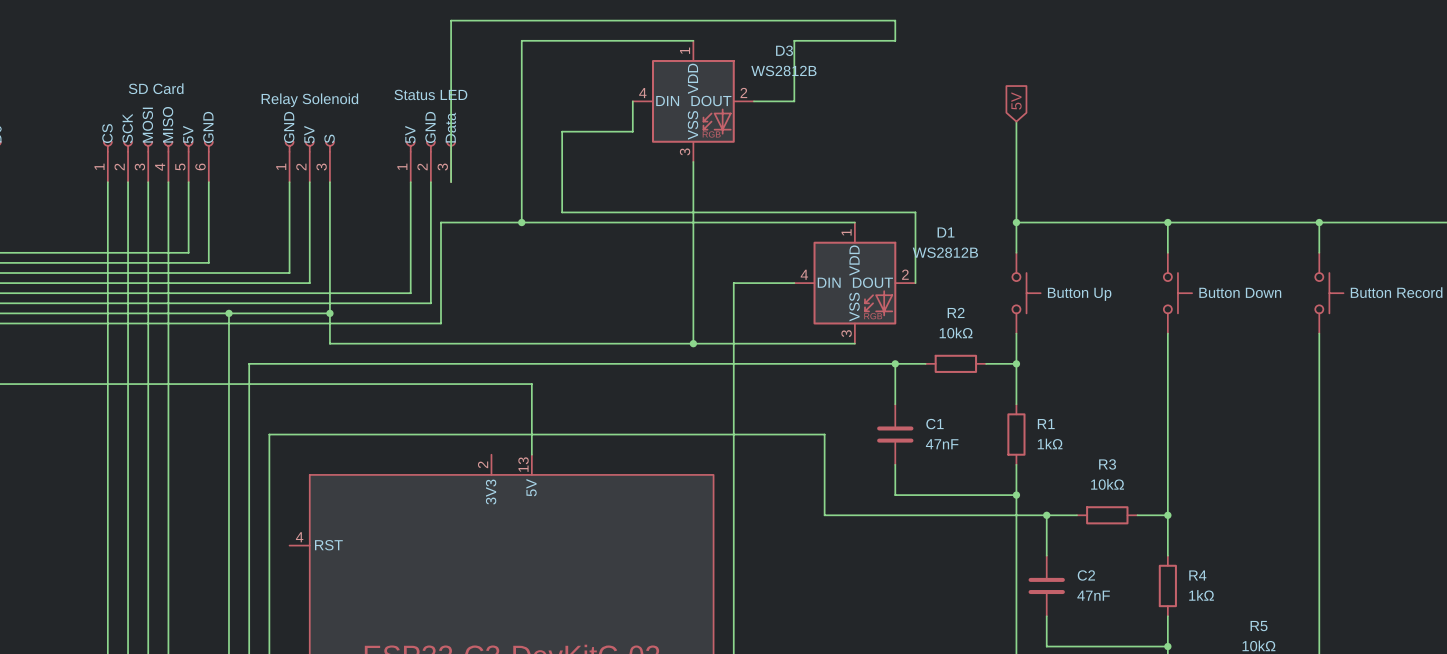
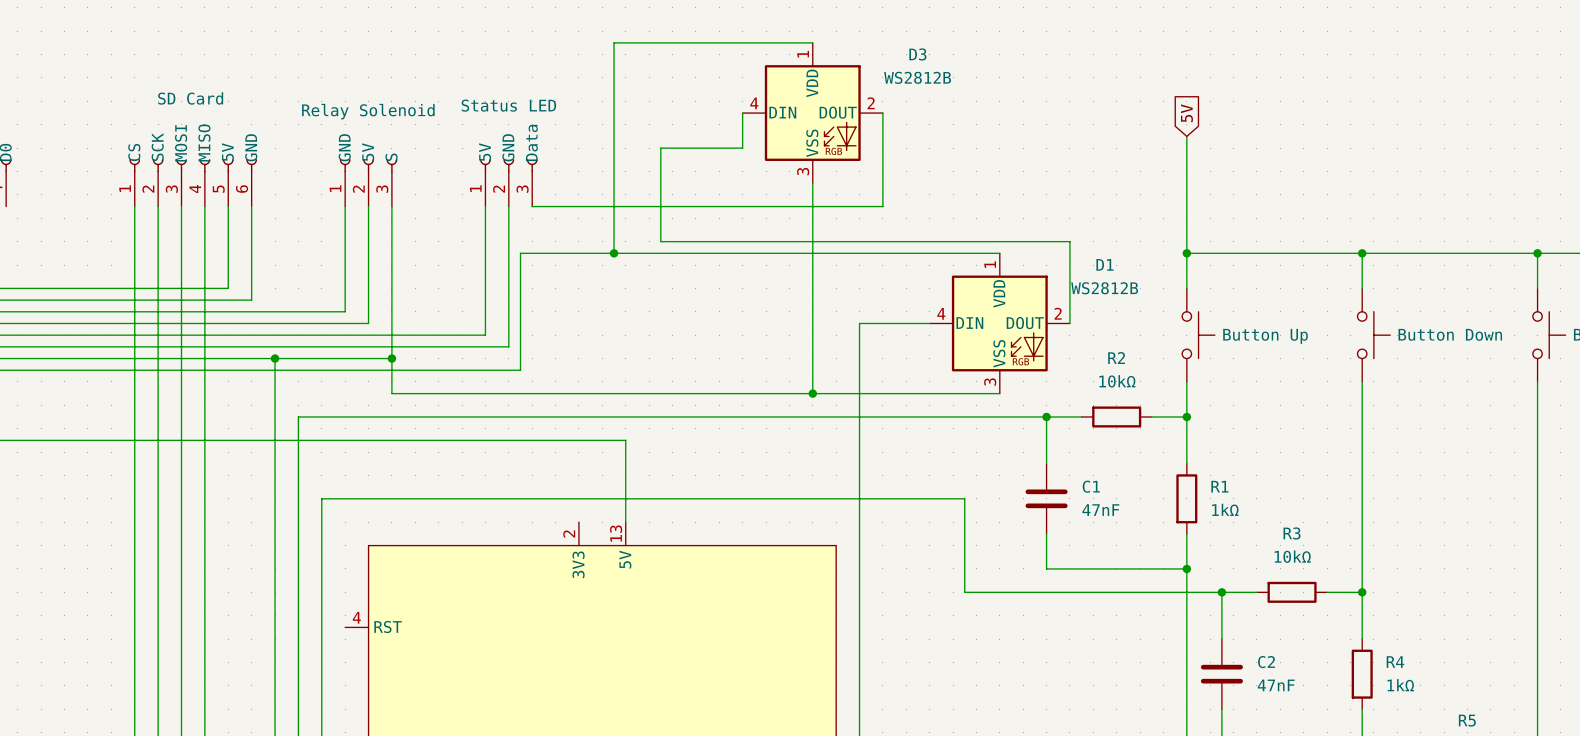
wire: (753, 101) (794, 101) (794, 40) (895, 40) (895, 20) (451, 20) (451, 182) -> (882, 113) (882, 206) (532, 206)

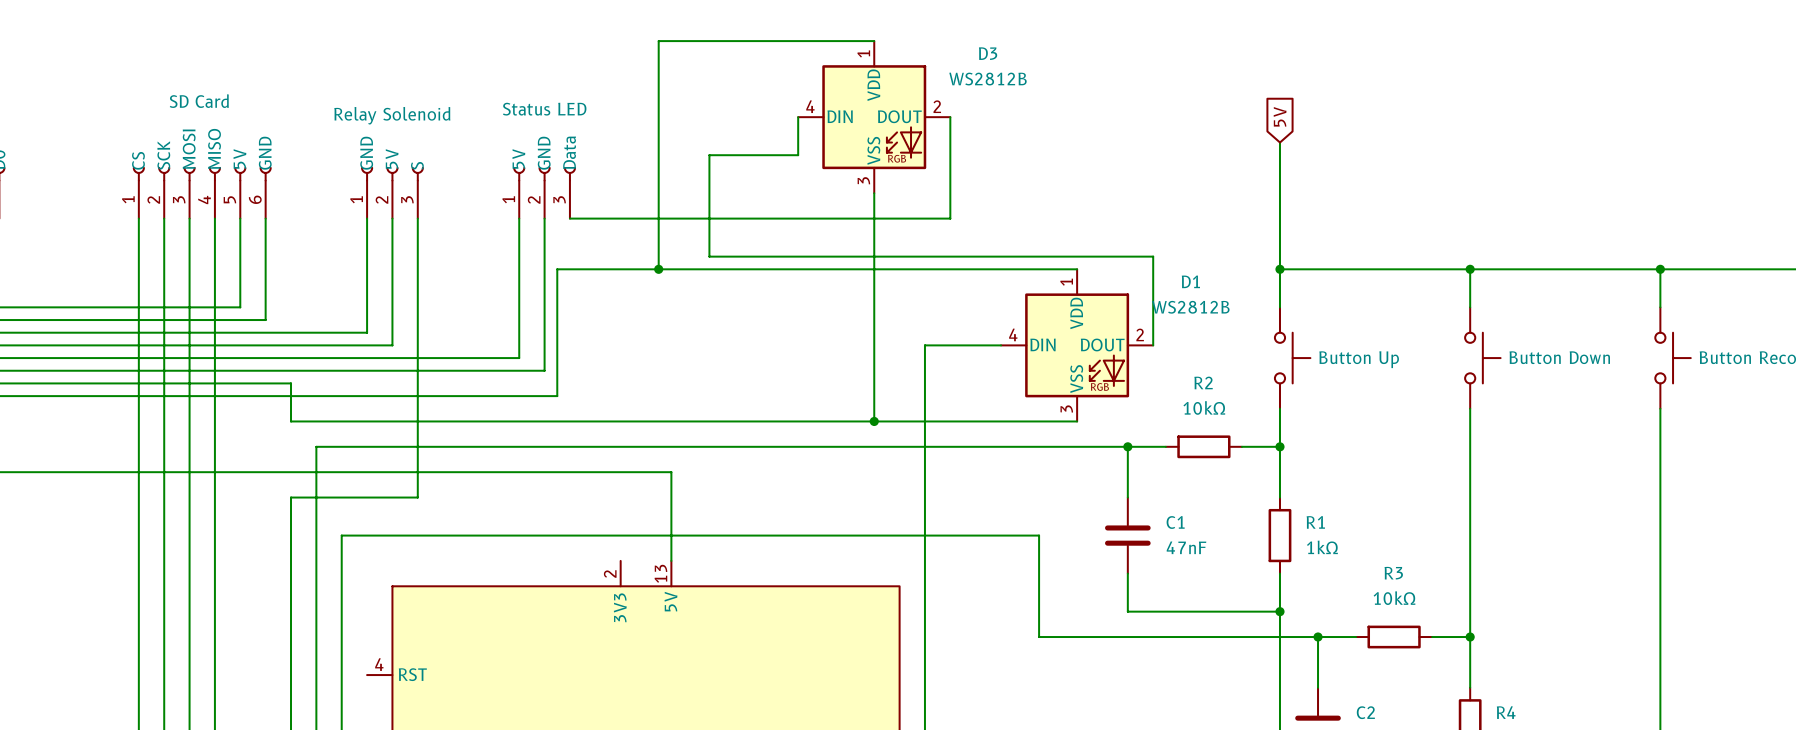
wire: (275, 358) (391, 358) -> none
junction: (275, 358) -> none
junction: (391, 358) -> none
wire: (275, 393) (275, 463) -> (291, 421) (417, 421) (417, 497) (291, 497)

